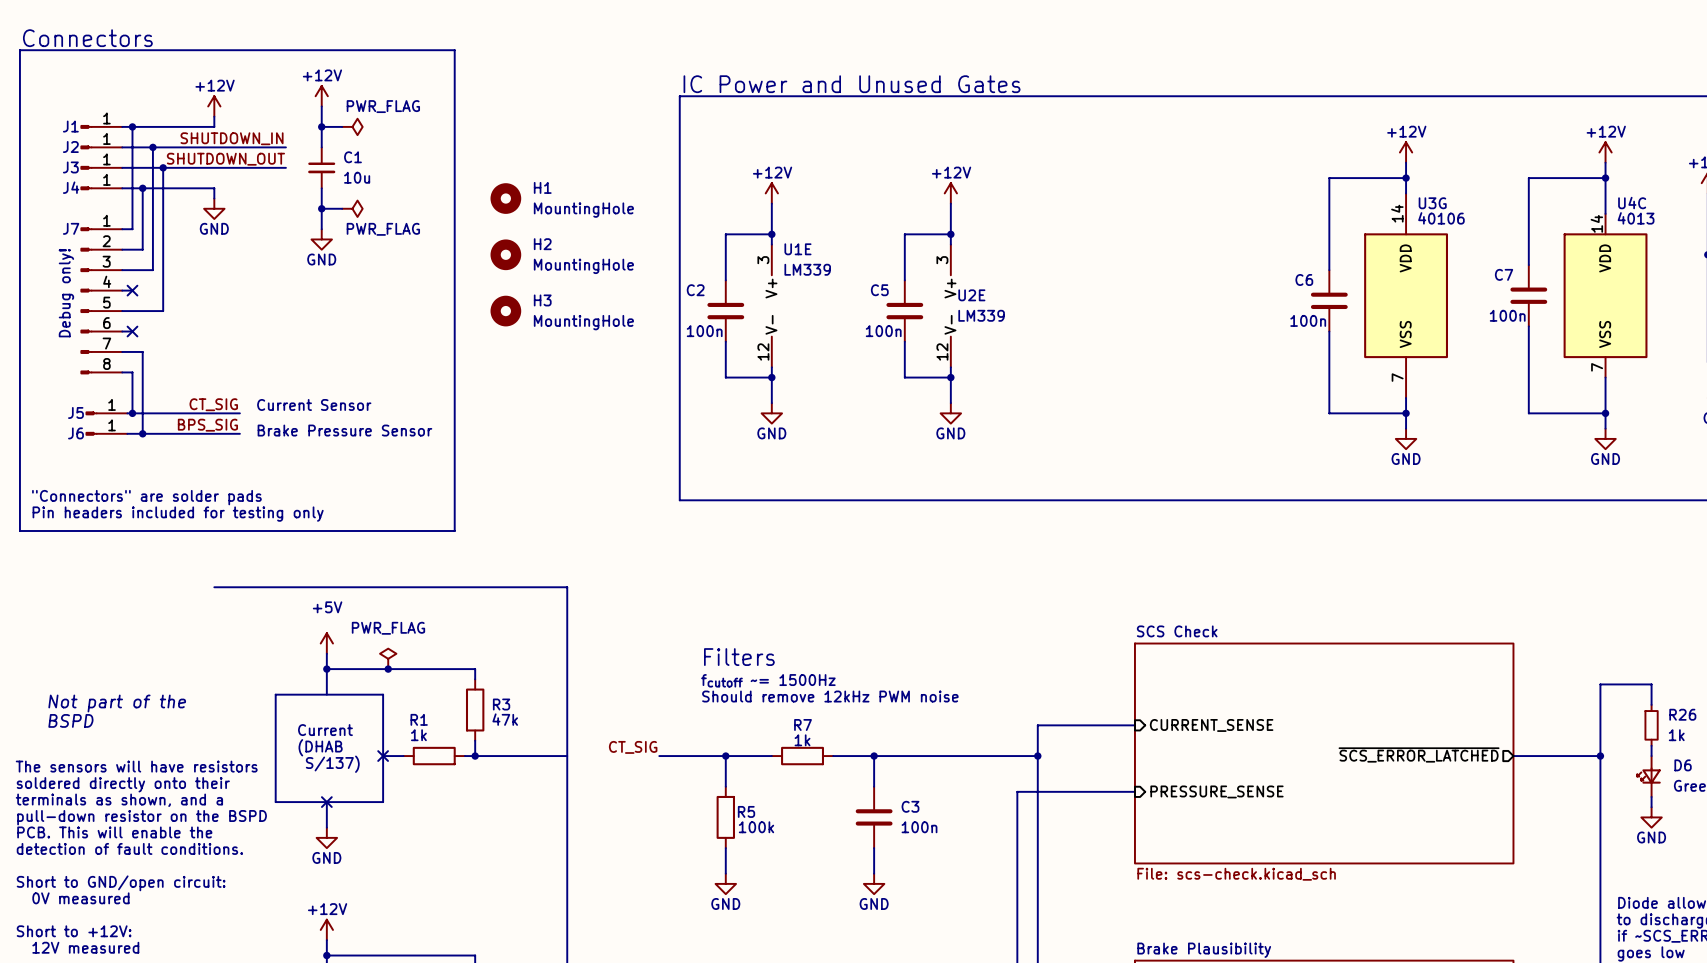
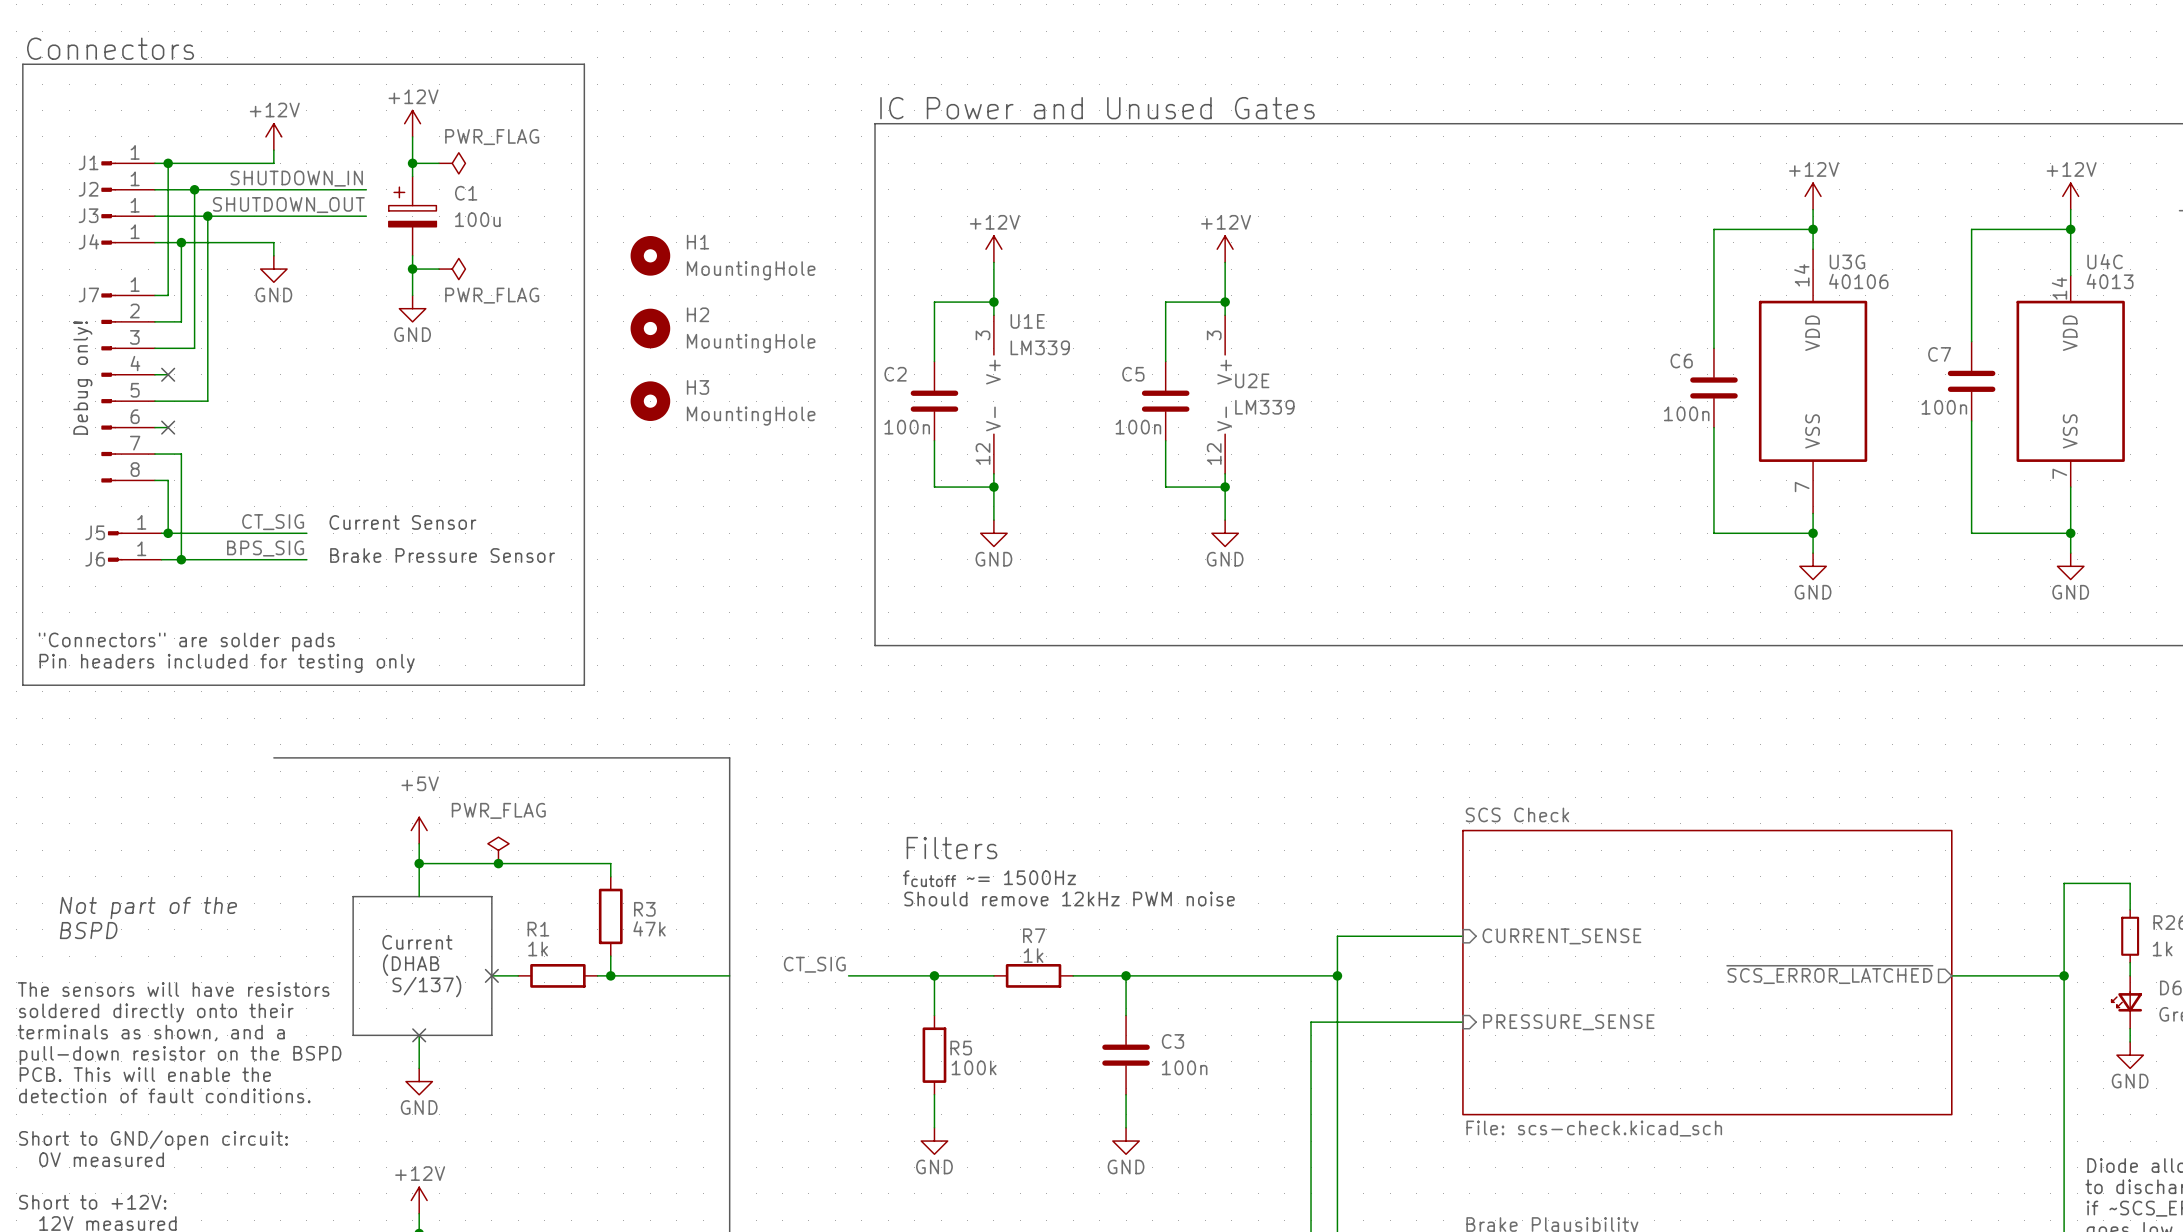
C1 symbol: [308, 147, 336, 189] -> [388, 176, 437, 256]
C1 value: 10u (357, 177) -> 100u (477, 219)

